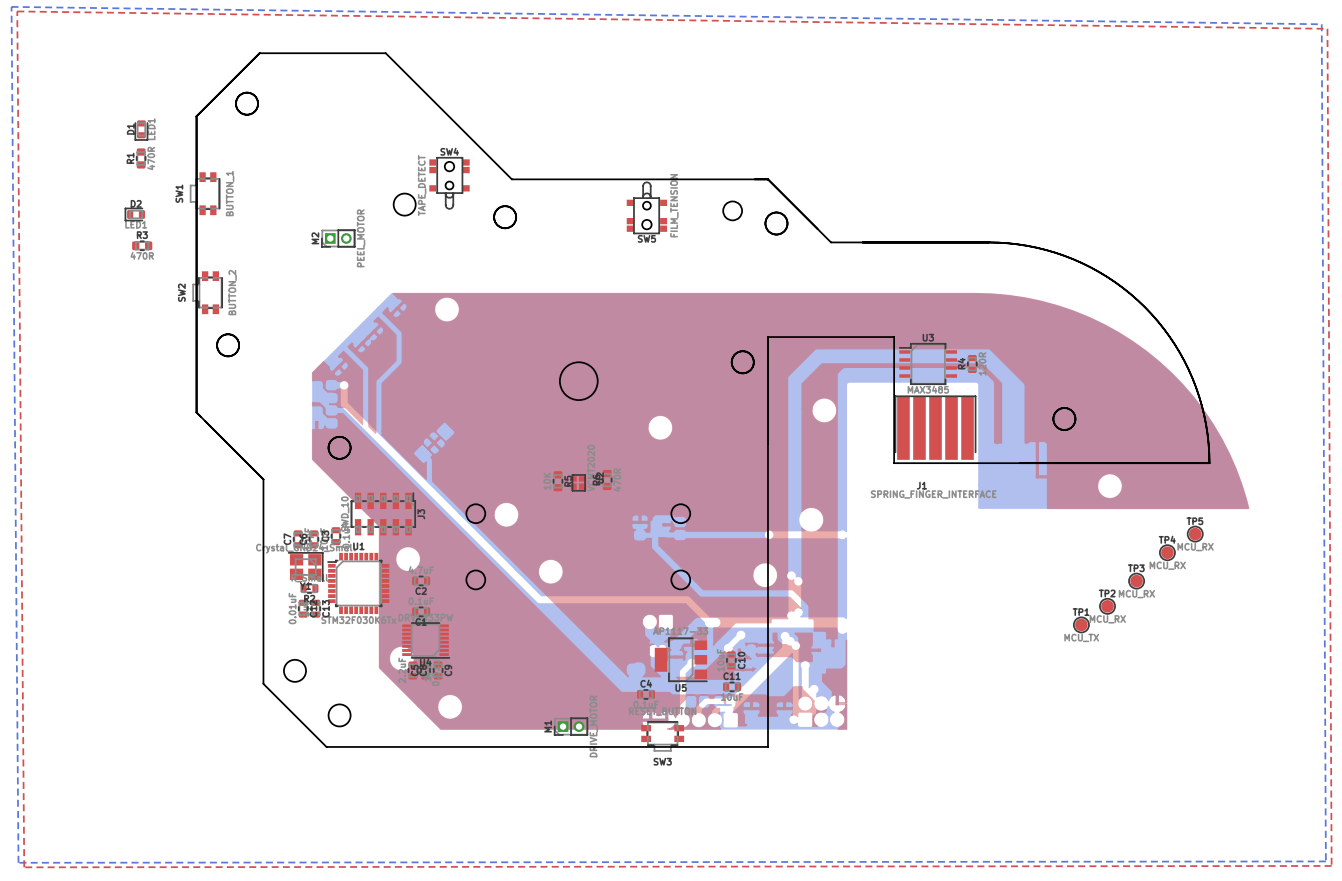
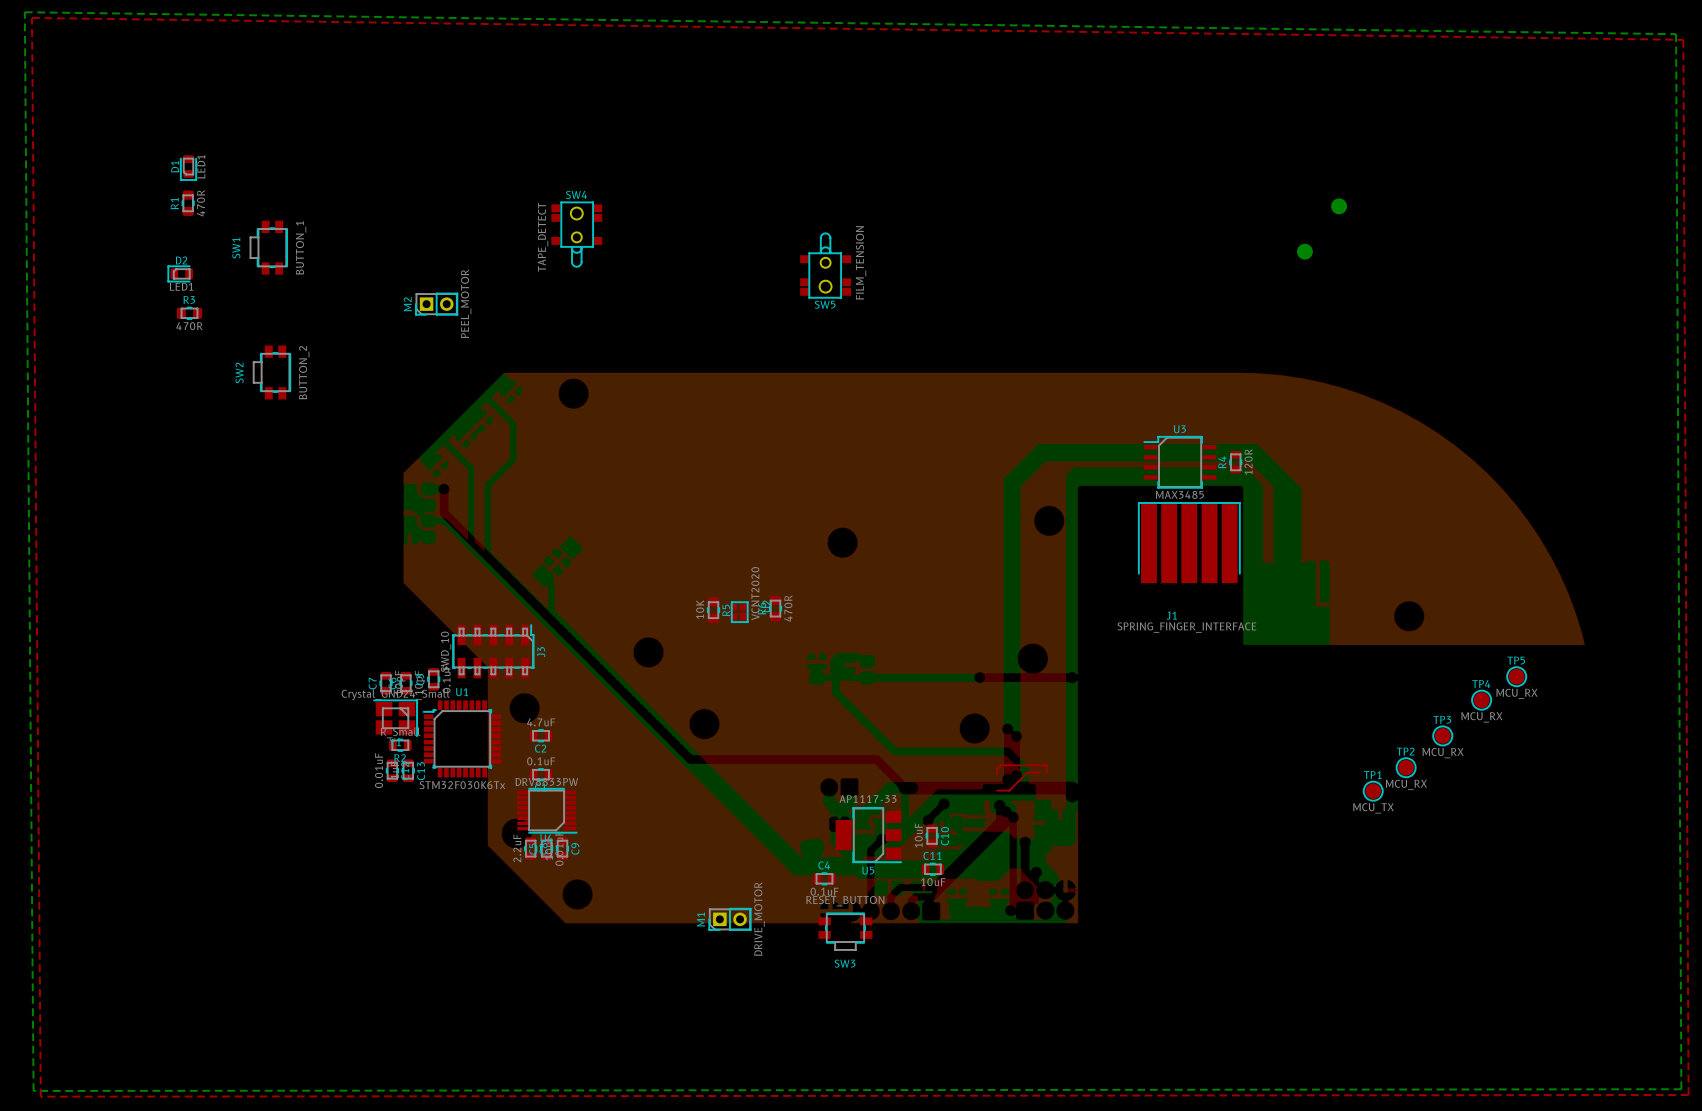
round board edge: [235, 92, 259, 116] -> none
part: none -> (1339, 206)
round board edge: [393, 192, 417, 217] -> none
part: none -> (1304, 251)
round board edge: [722, 200, 743, 221] -> none
round board edge: [493, 205, 517, 229] -> none
round board edge: [764, 211, 789, 236] -> none
board edge: (988, 242) (831, 242) (767, 179) (511, 179) (385, 53) (259, 53) (196, 116) (196, 412) (263, 479) (263, 683) (326, 746) (767, 746) (767, 337) (894, 337) (894, 463) (1209, 463) -> none
board edge: (988, 242) (1027, 245) (1073, 259) (1115, 282) (1144, 307) (1174, 344) (1192, 378) (1204, 415) (1209, 463) -> none
board edge: (988, 242) (1027, 245) (1073, 259) (1115, 282) (1144, 307) (1174, 344) (1192, 378) (1204, 415) (1209, 463) -> none
round board edge: [216, 333, 240, 357] -> none
round board edge: [731, 350, 755, 374] -> none
round board edge: [559, 361, 599, 401] -> none
round board edge: [1052, 407, 1077, 431] -> none
round board edge: [327, 436, 352, 460] -> none
round board edge: [465, 503, 486, 524] -> none
round board edge: [670, 503, 691, 524] -> none
round board edge: [465, 569, 486, 591] -> none
round board edge: [670, 569, 691, 591] -> none
top track: none -> (1040, 772) (1027, 772) (1009, 790) (997, 790)
top track: none -> (1046, 772) (1045, 765) (1000, 765) (997, 768) (997, 774)
round board edge: [283, 659, 307, 683] -> none
round board edge: [327, 703, 352, 728] -> none

